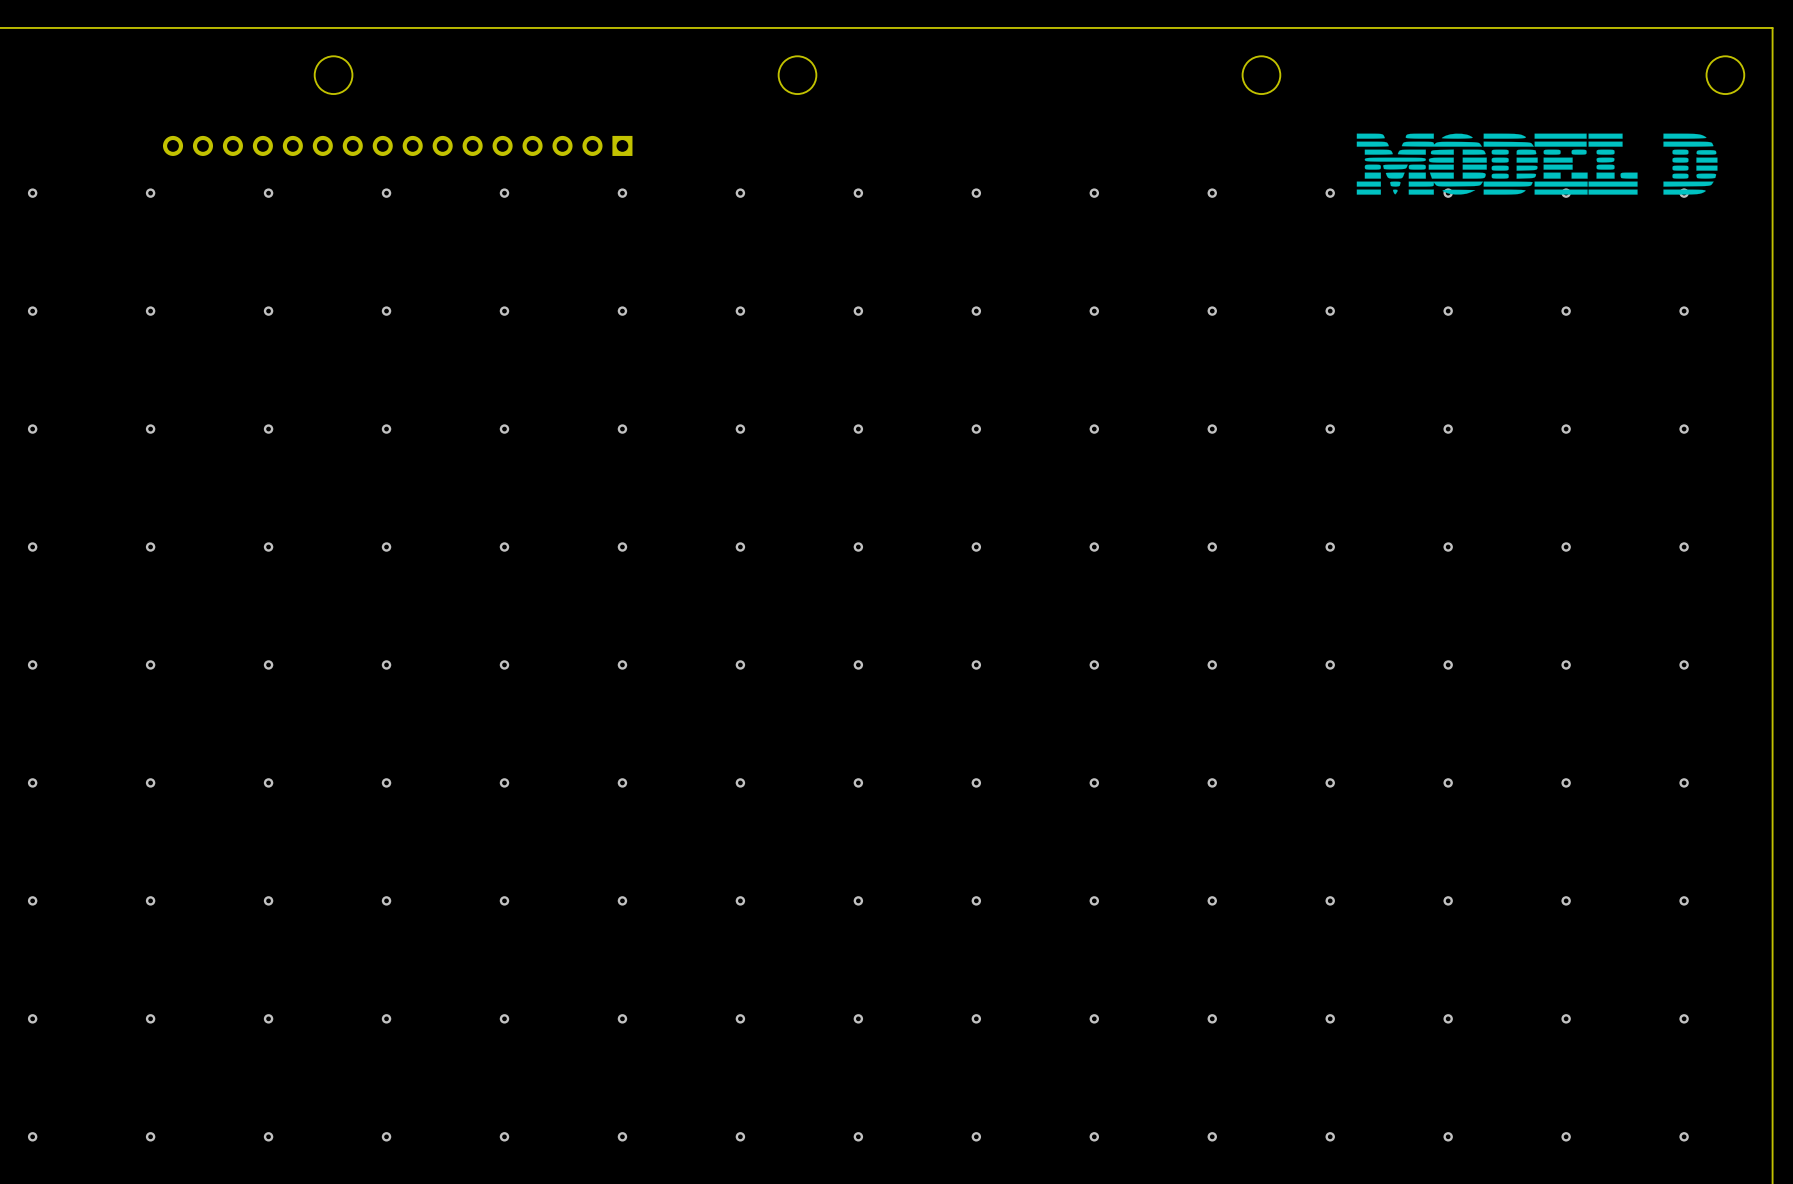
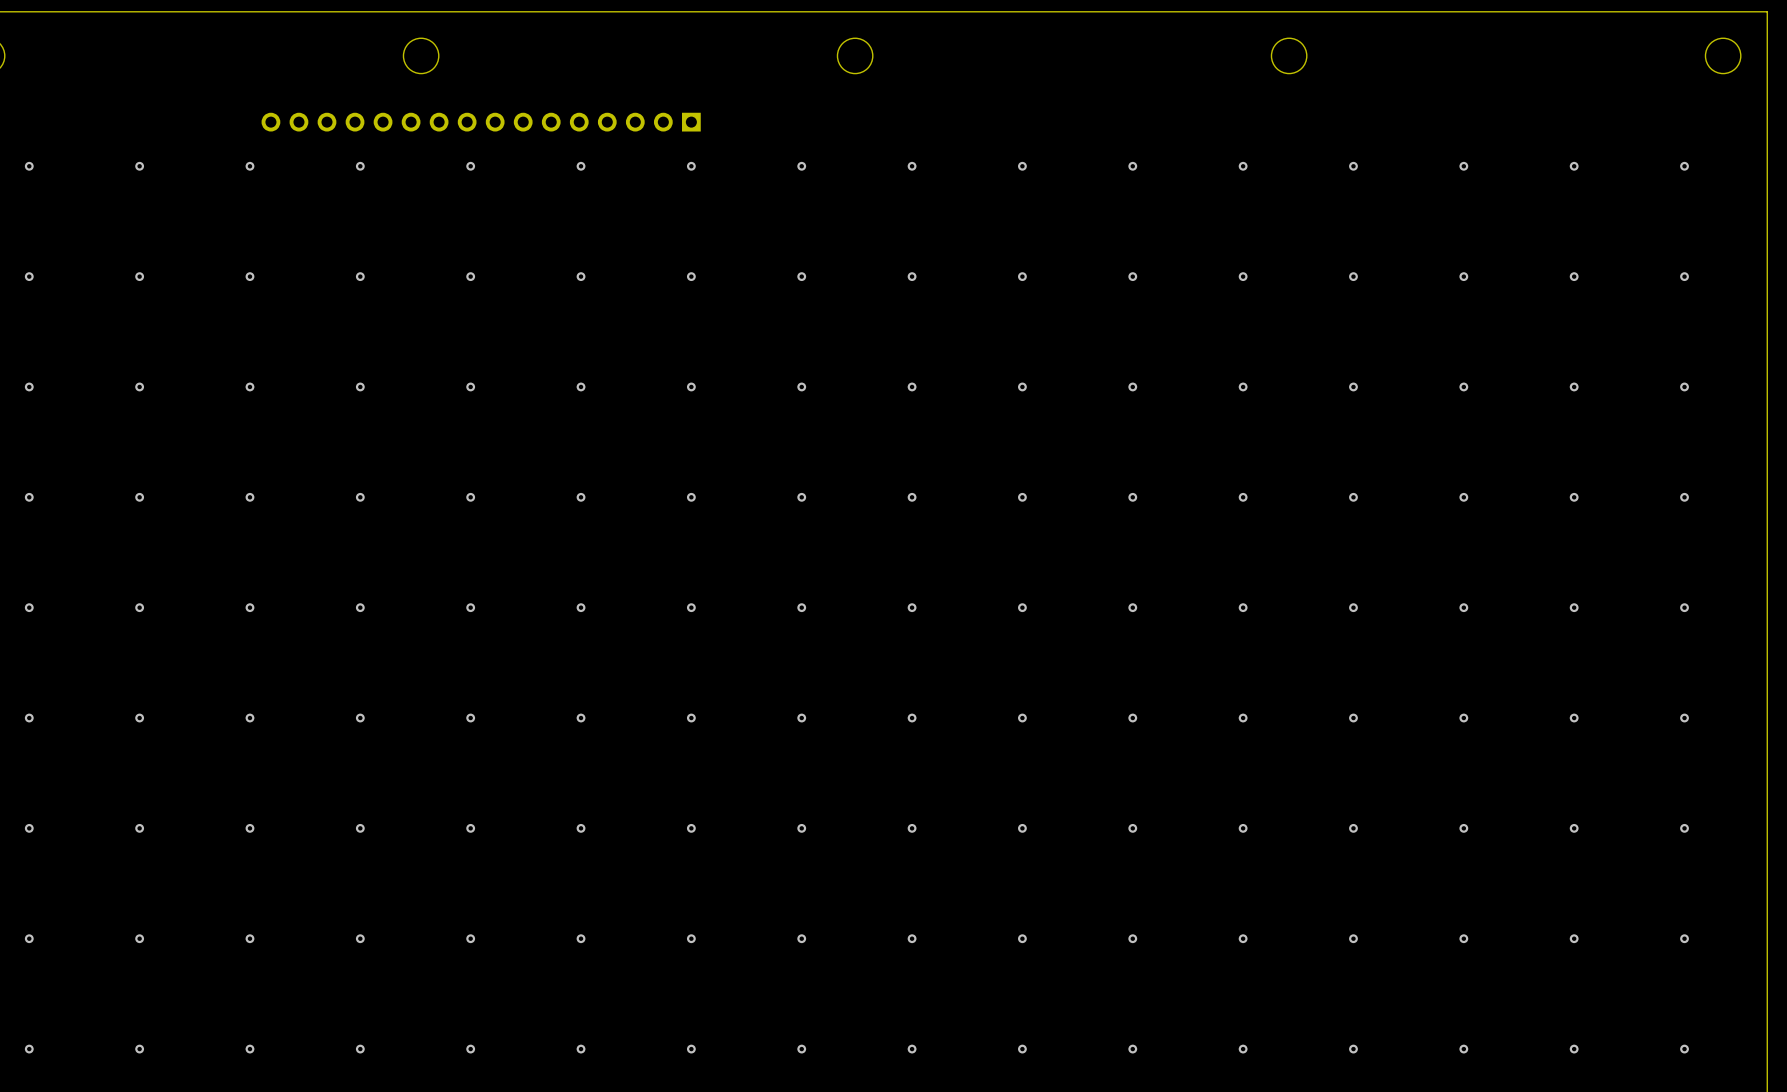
drawing: [1356, 133, 1718, 195] -> none

